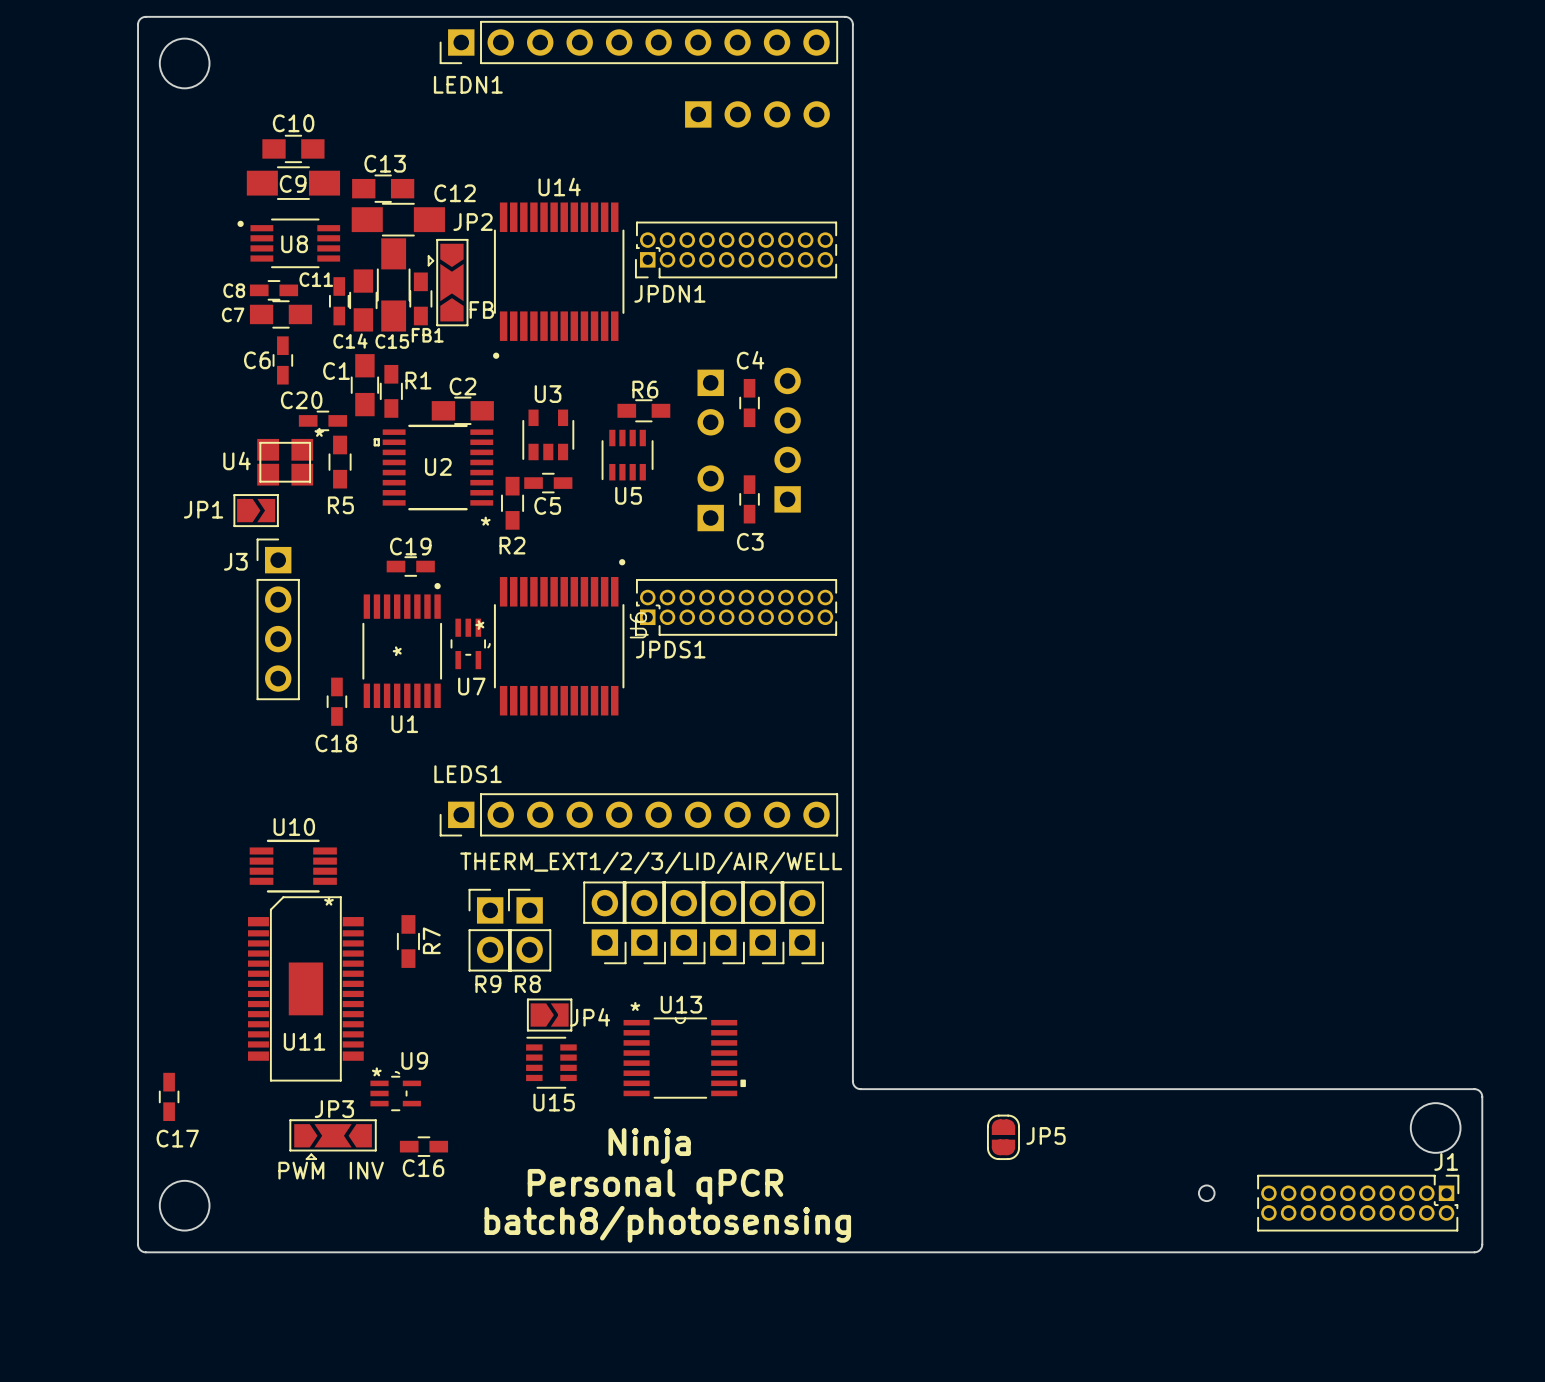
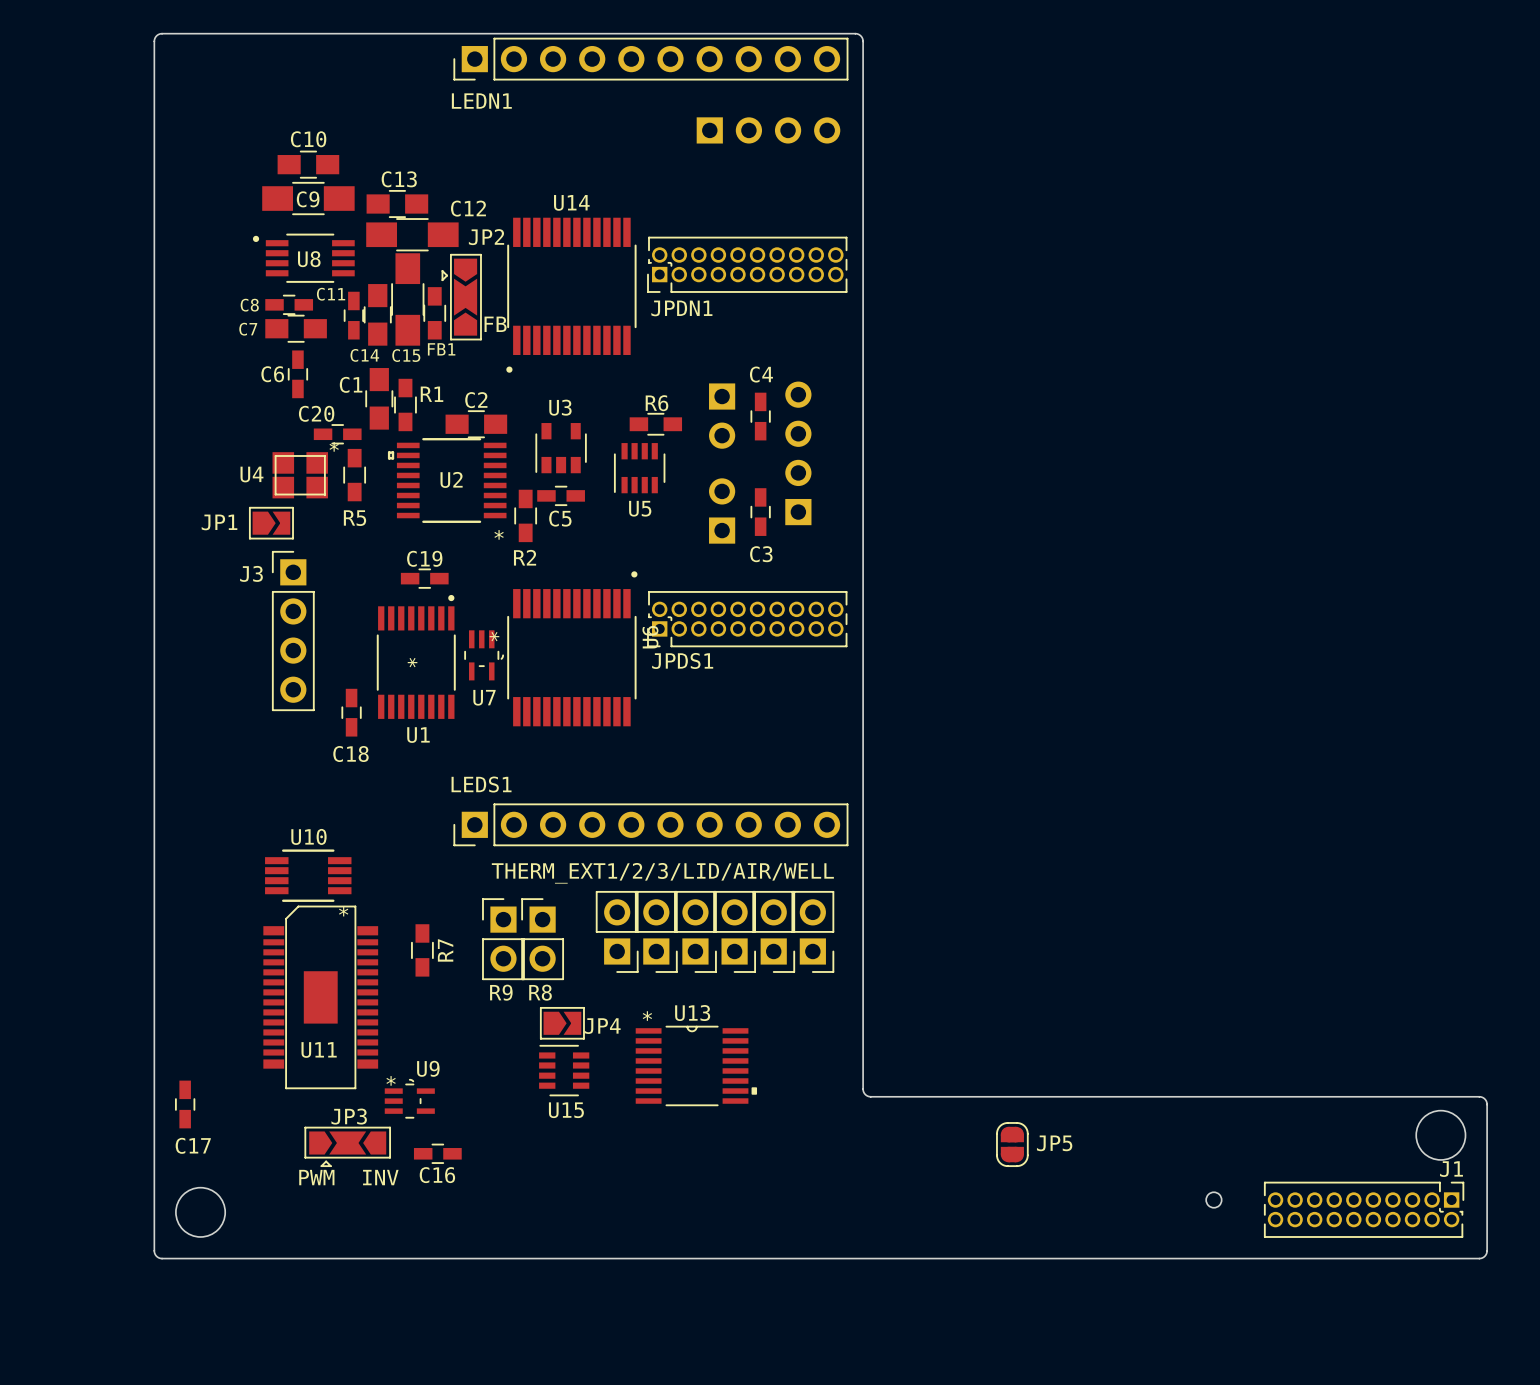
round board edge: [159, 37, 211, 90] -> none
text: Ninja (649, 1145) -> none
text: Personal qPCR (655, 1186) -> none
text: batch8/photosensing (667, 1224) -> none

